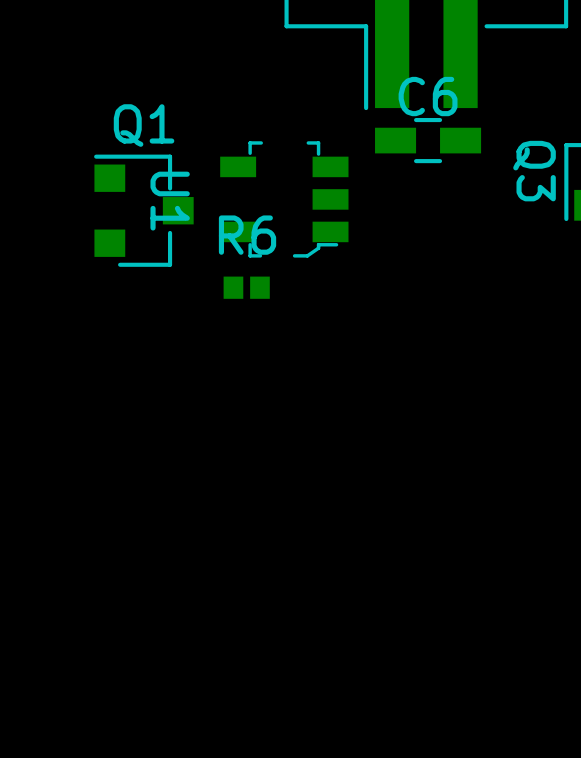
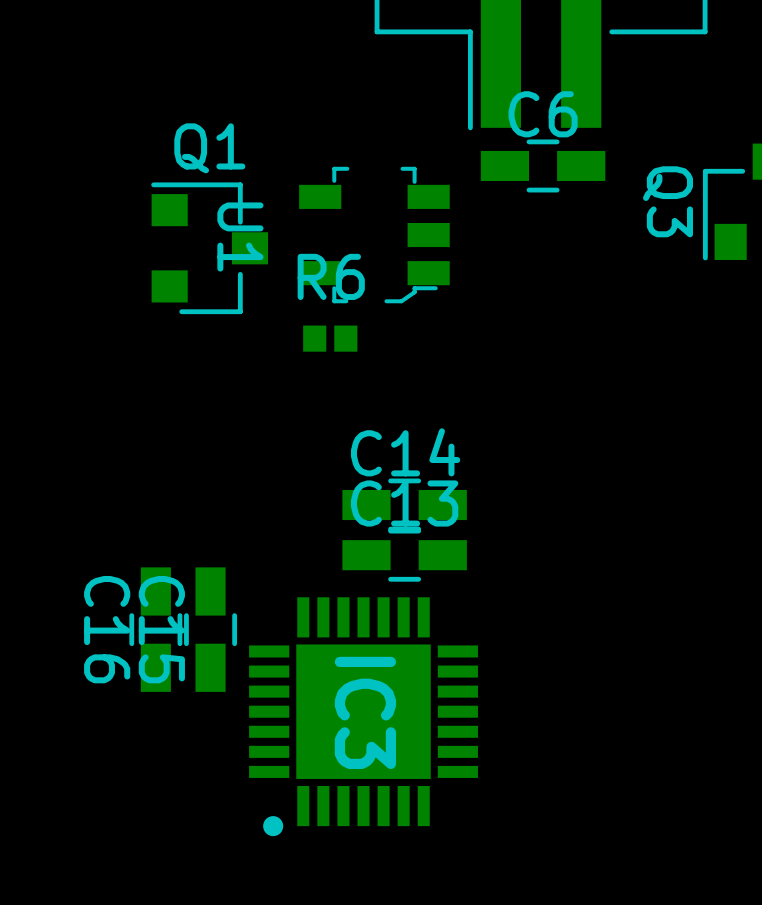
C14: none -> (404, 505)
C13: none -> (404, 555)
C16: none -> (155, 629)
C15: none -> (210, 629)
IC3: none -> (363, 716)

